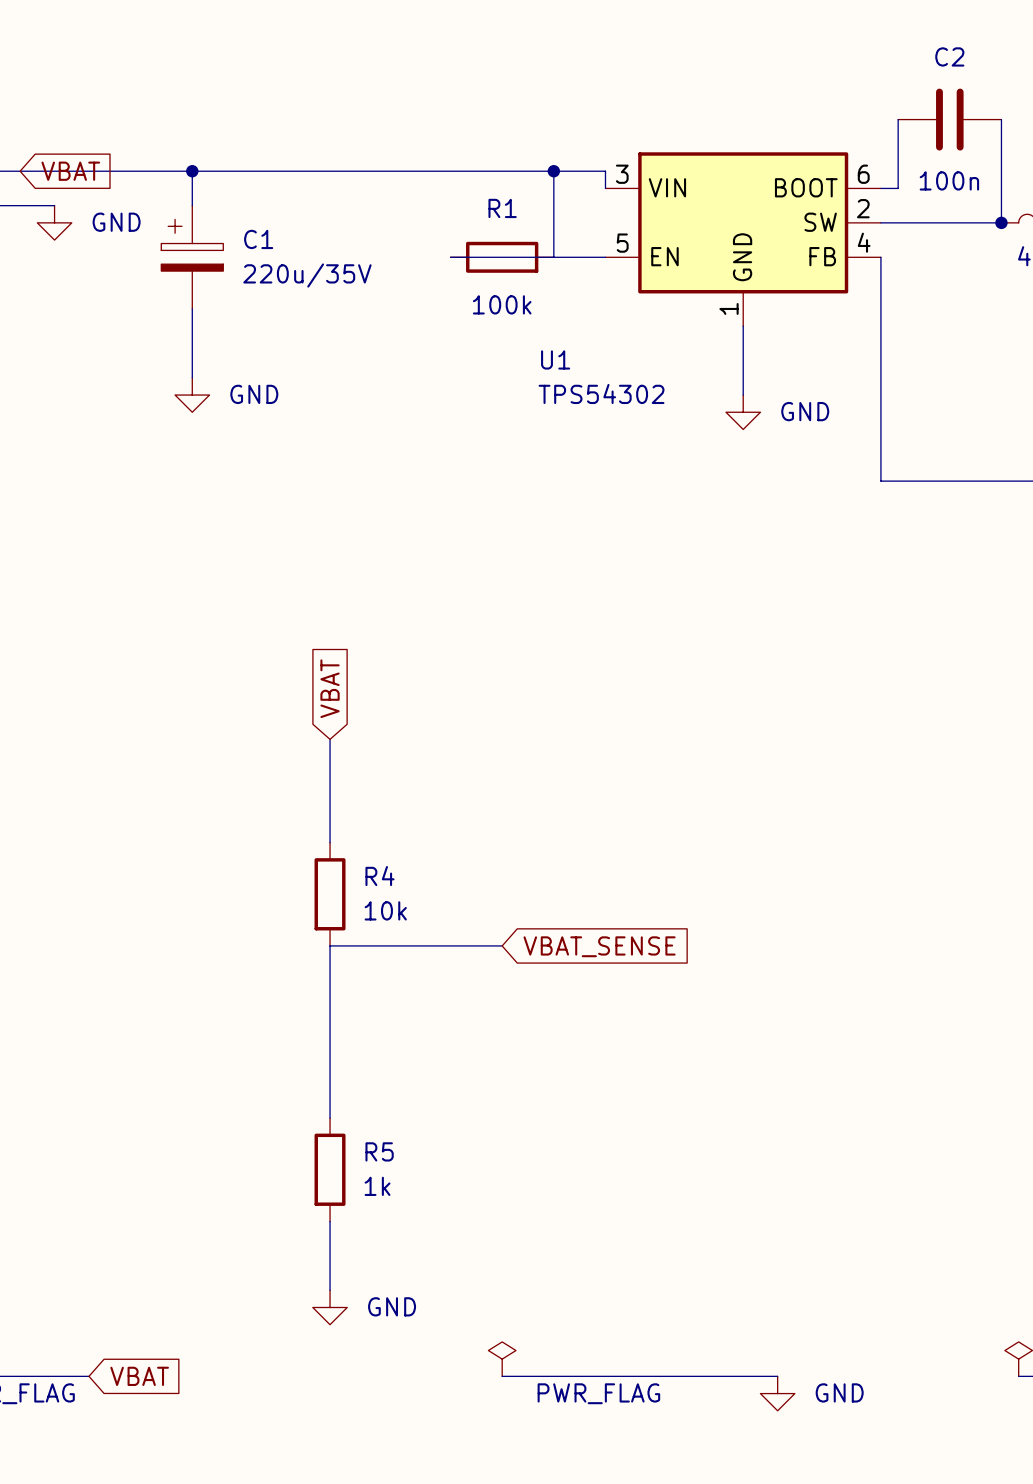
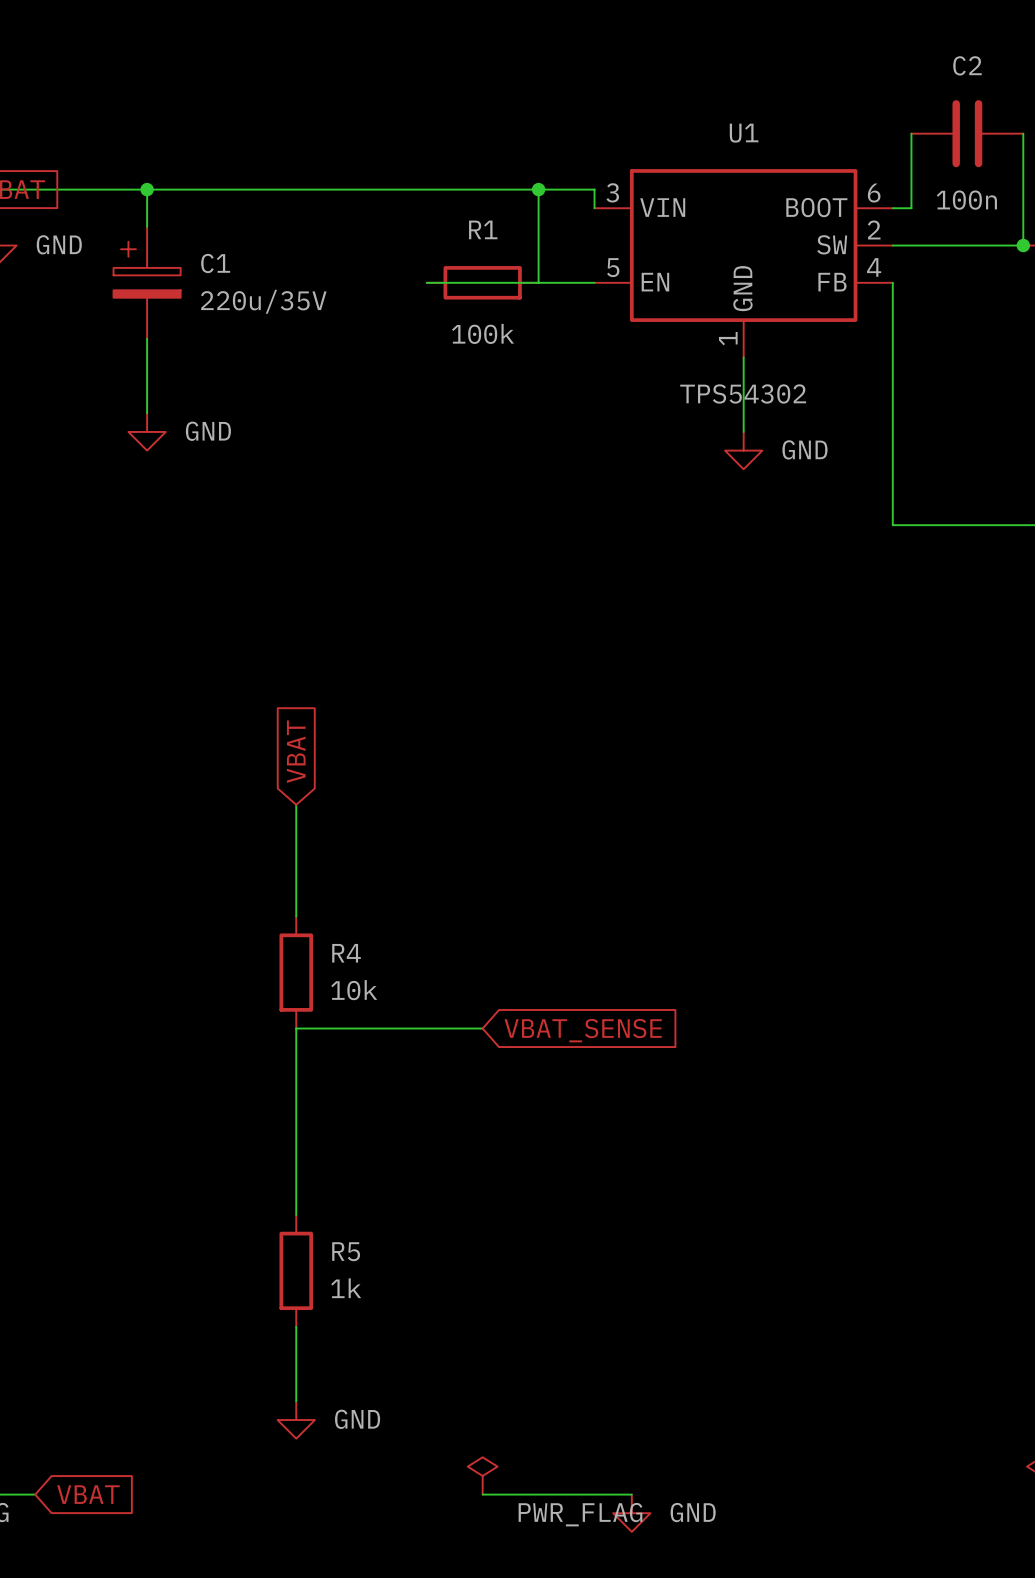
U1 name position: U1 (555, 359) -> U1 (744, 133)
U1 value position: TPS54302 (601, 393) -> TPS54302 (743, 393)
wire: (639, 1376) (777, 1376) -> none
power symbol position: GND (777, 1393) -> GND (631, 1513)

